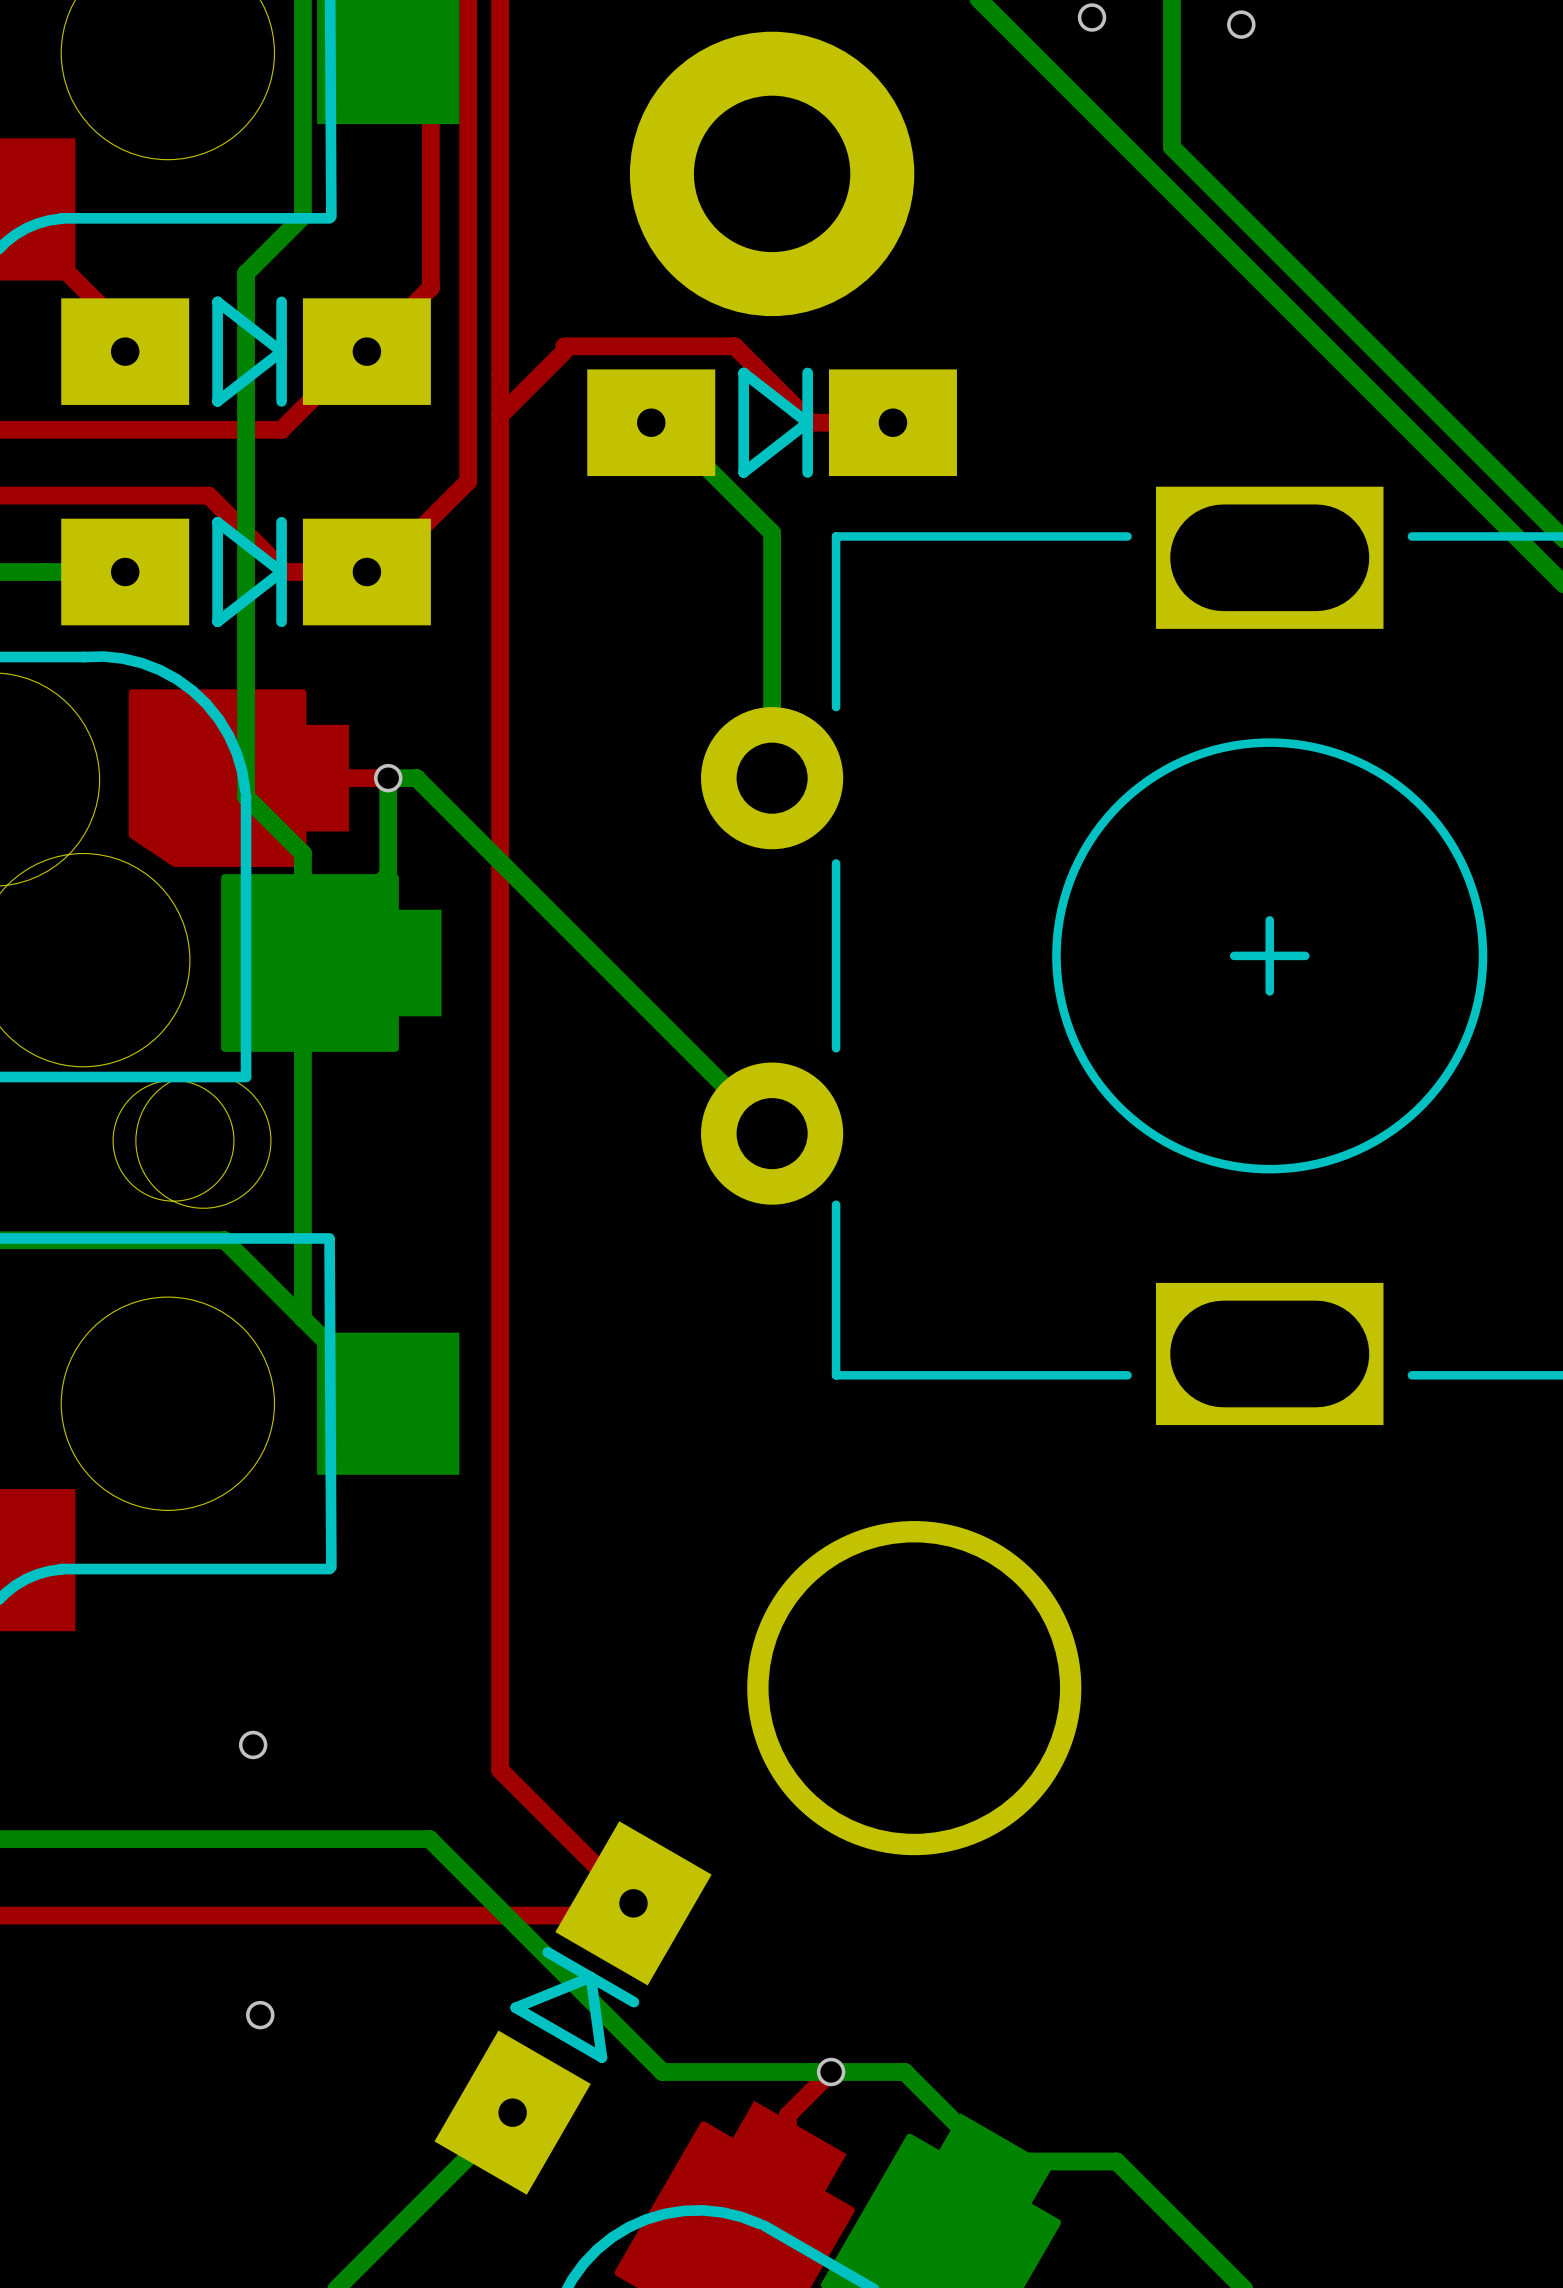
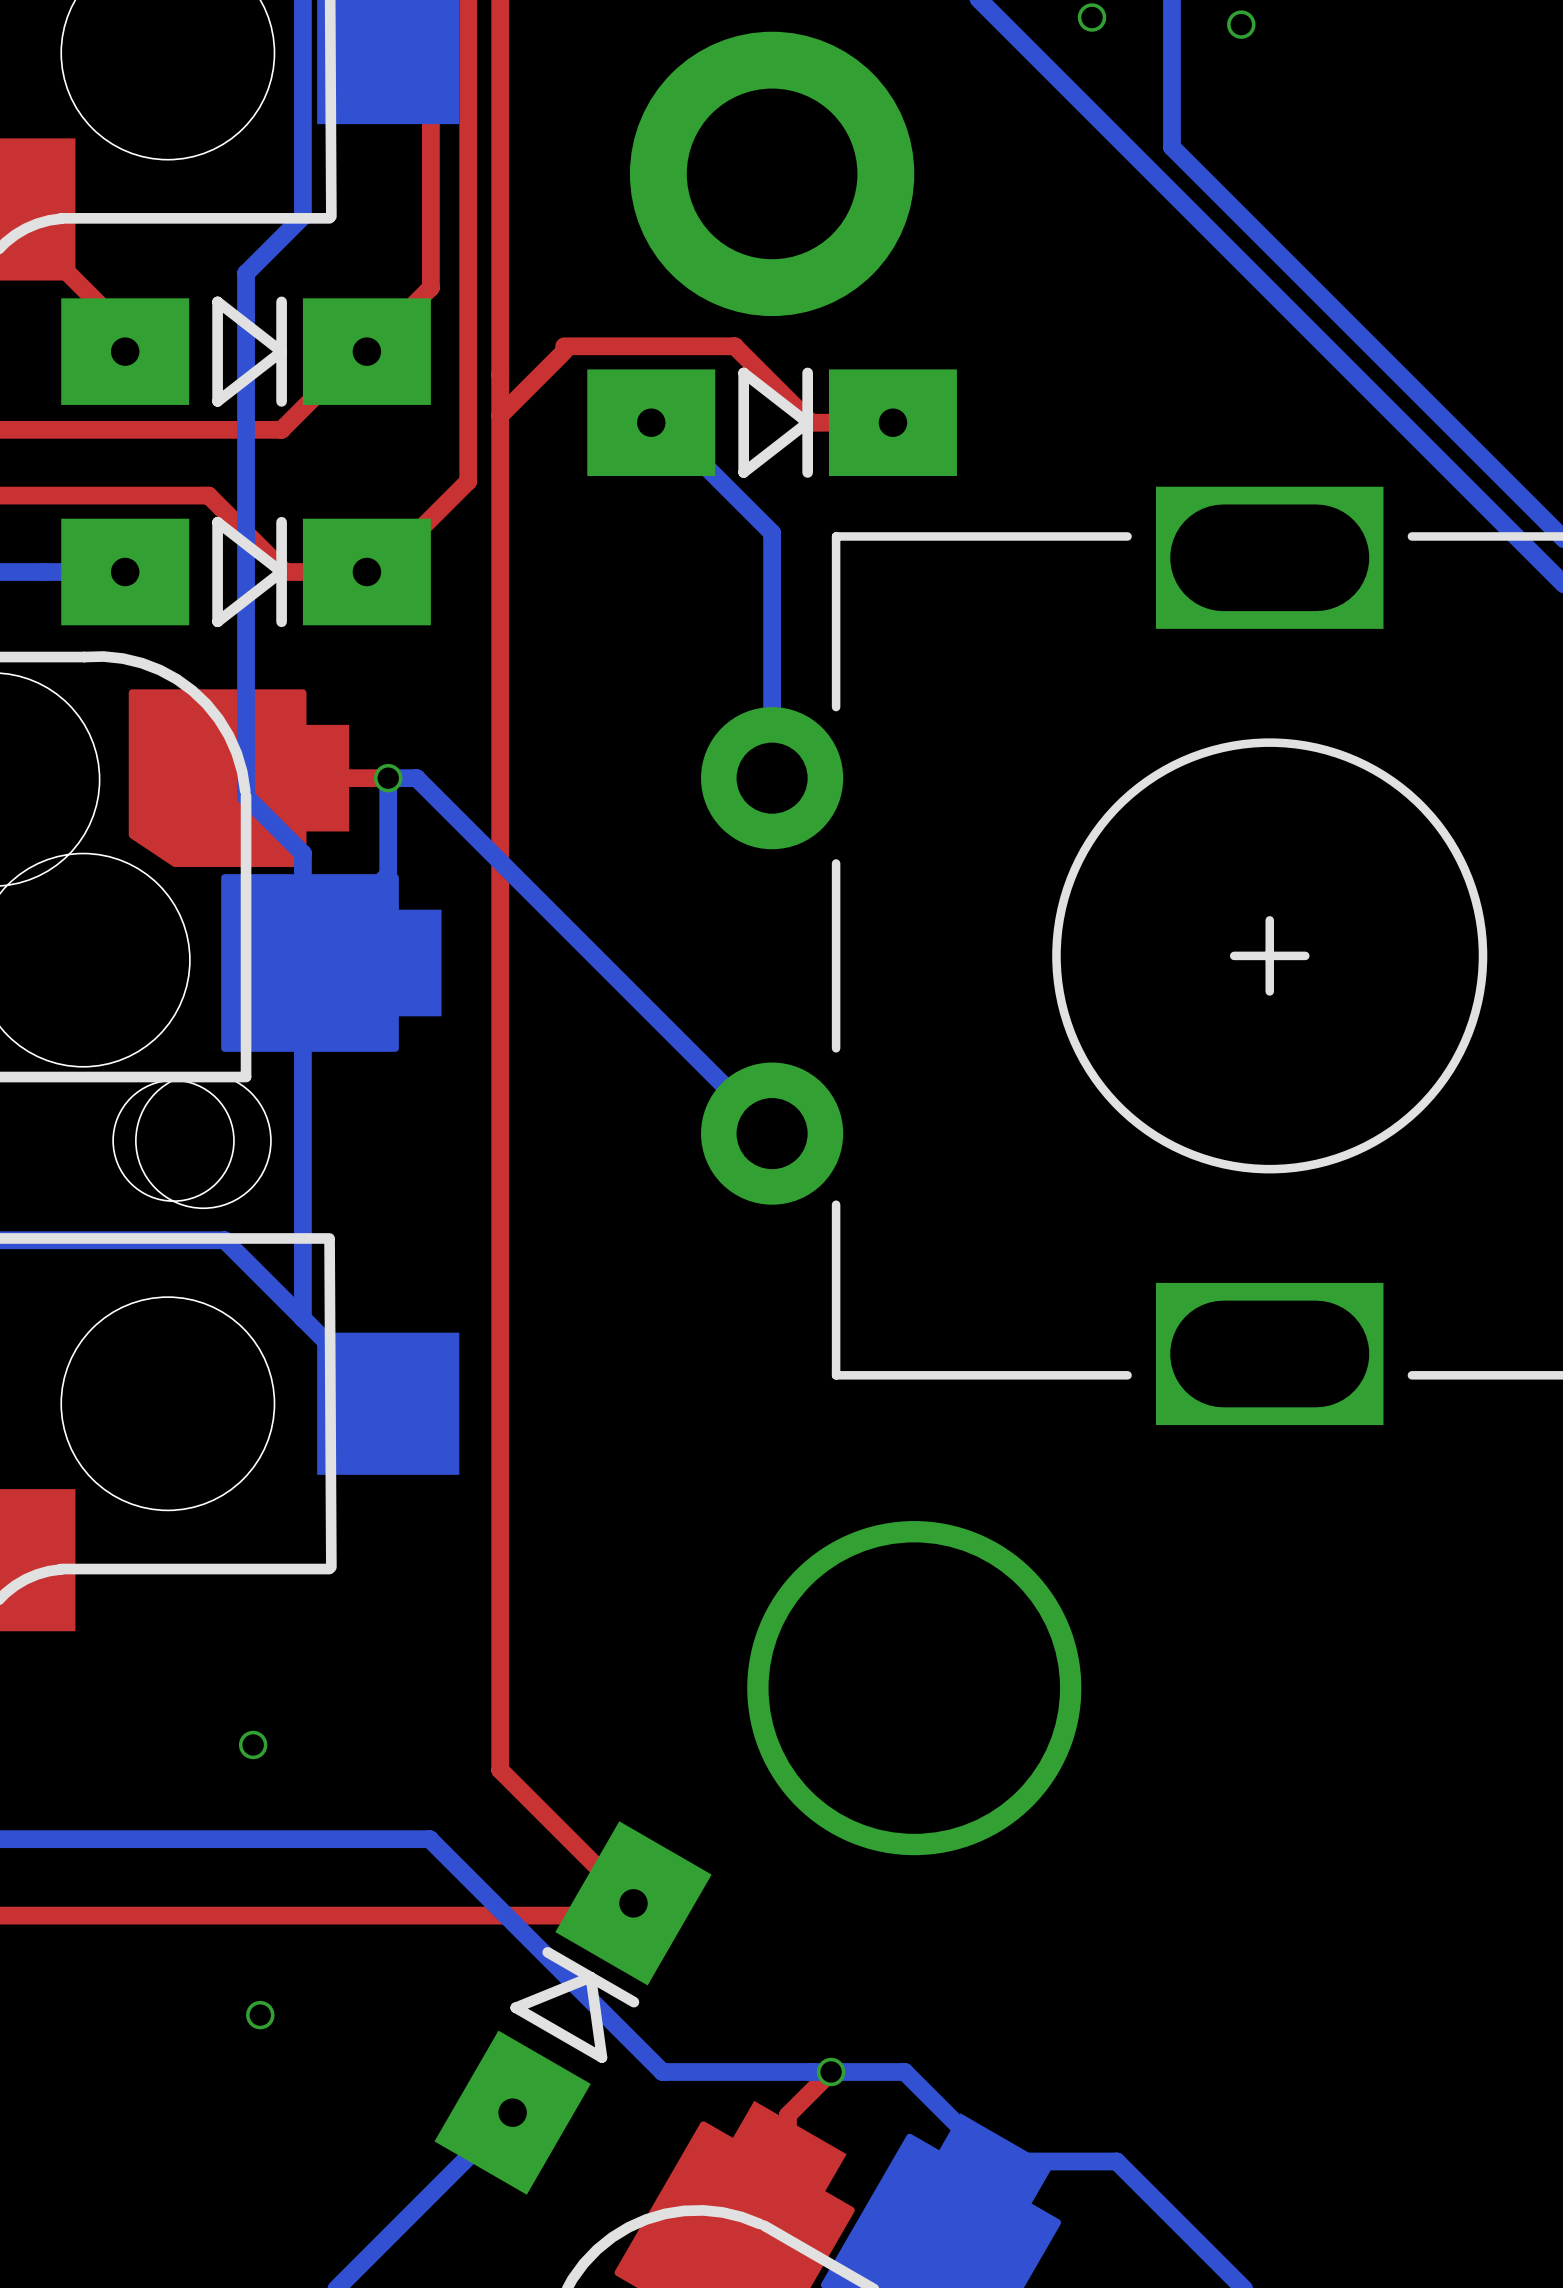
part footprint: [629, 31, 915, 317] -> [629, 31, 915, 317]

